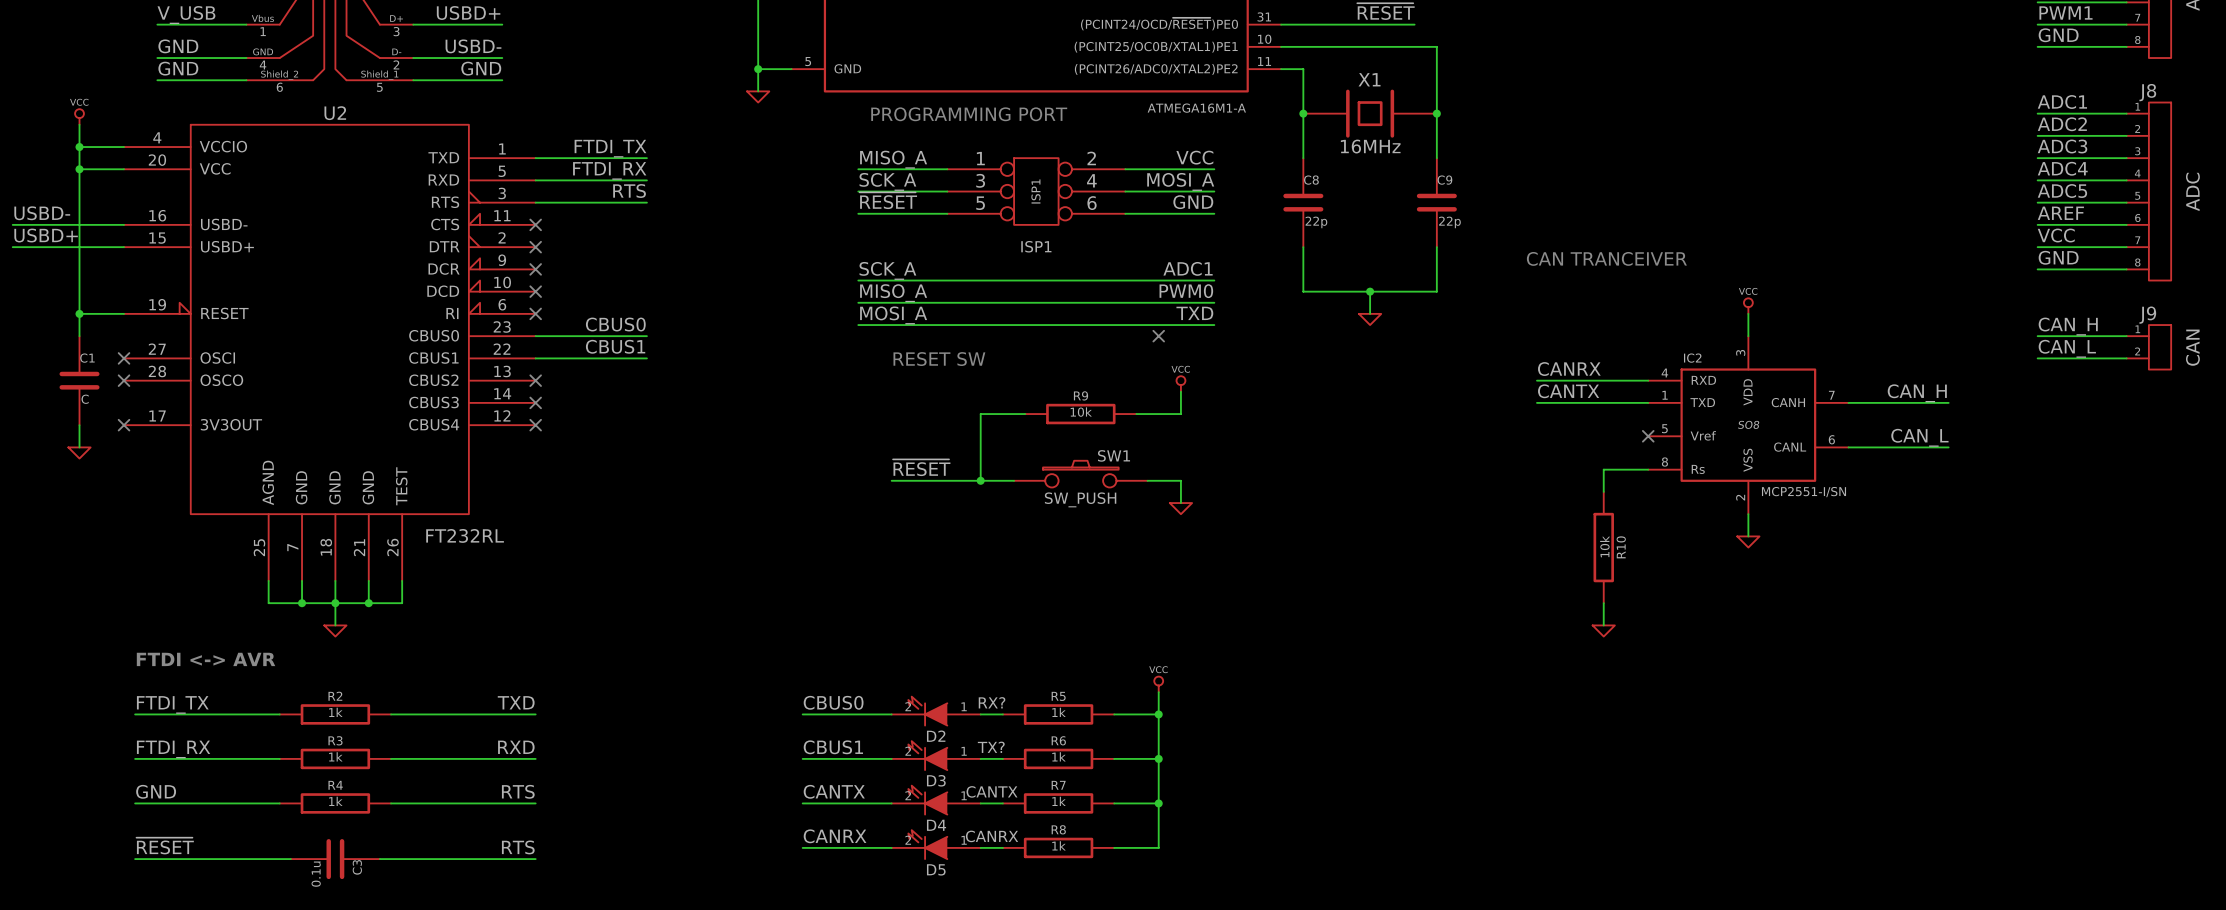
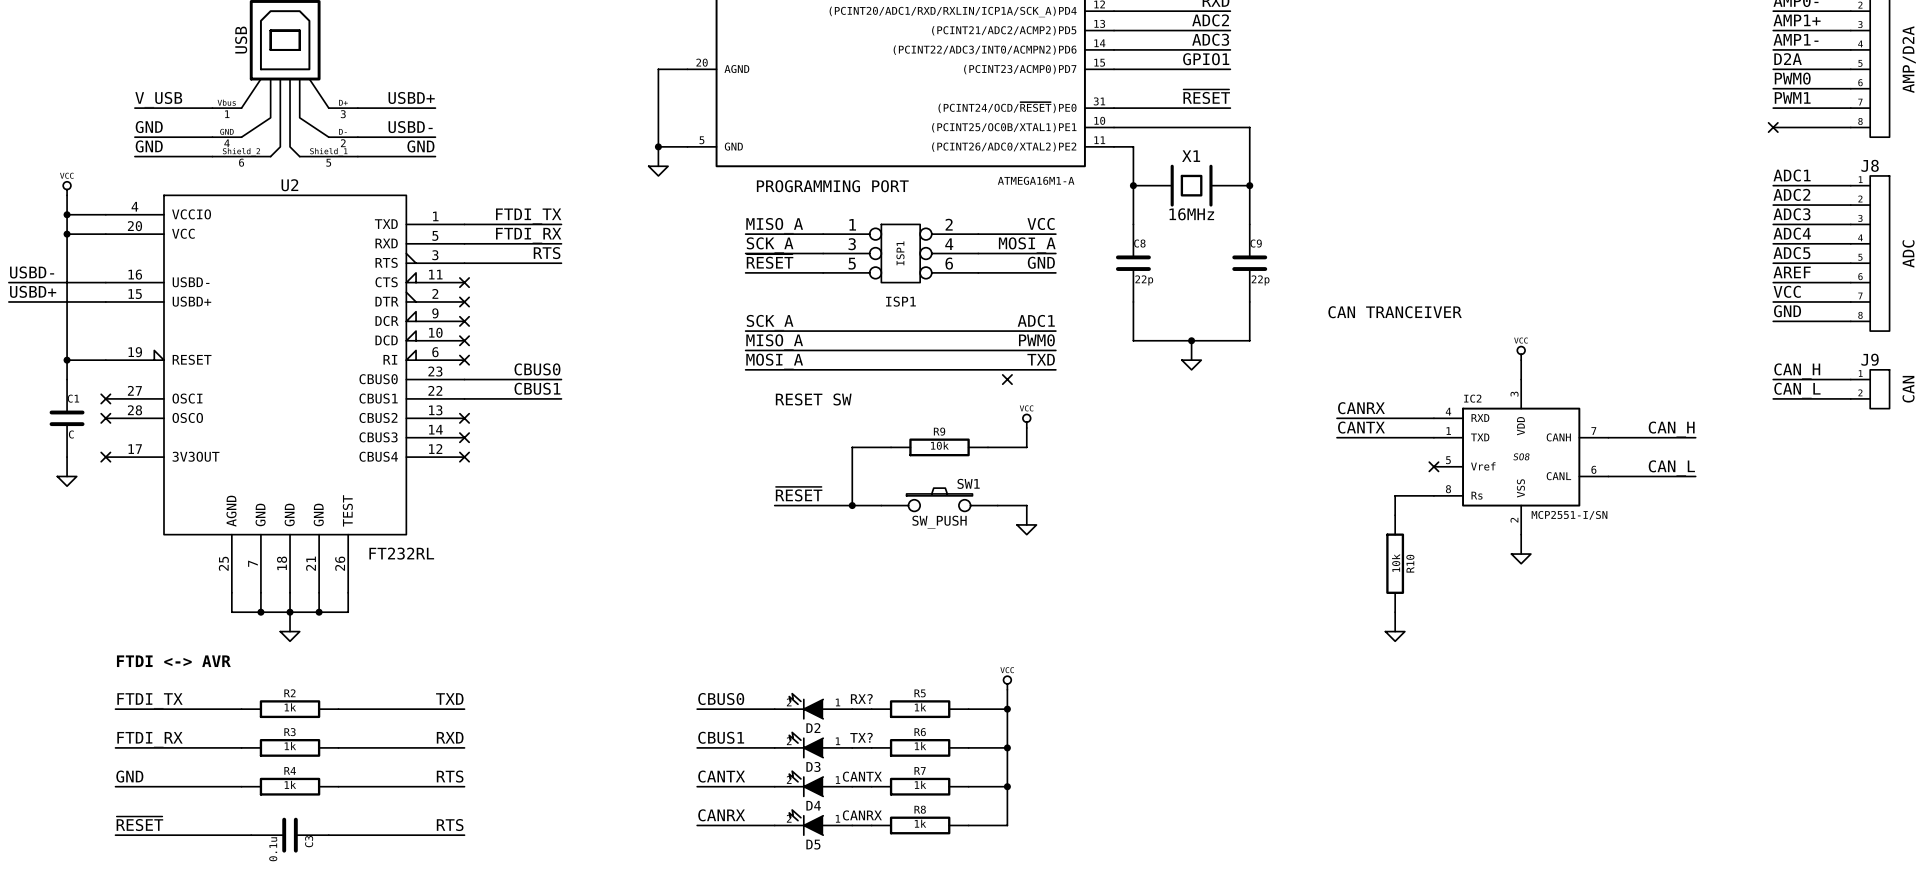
label: GND (2058, 35) -> none
no-connect mark: none -> (1773, 127)

